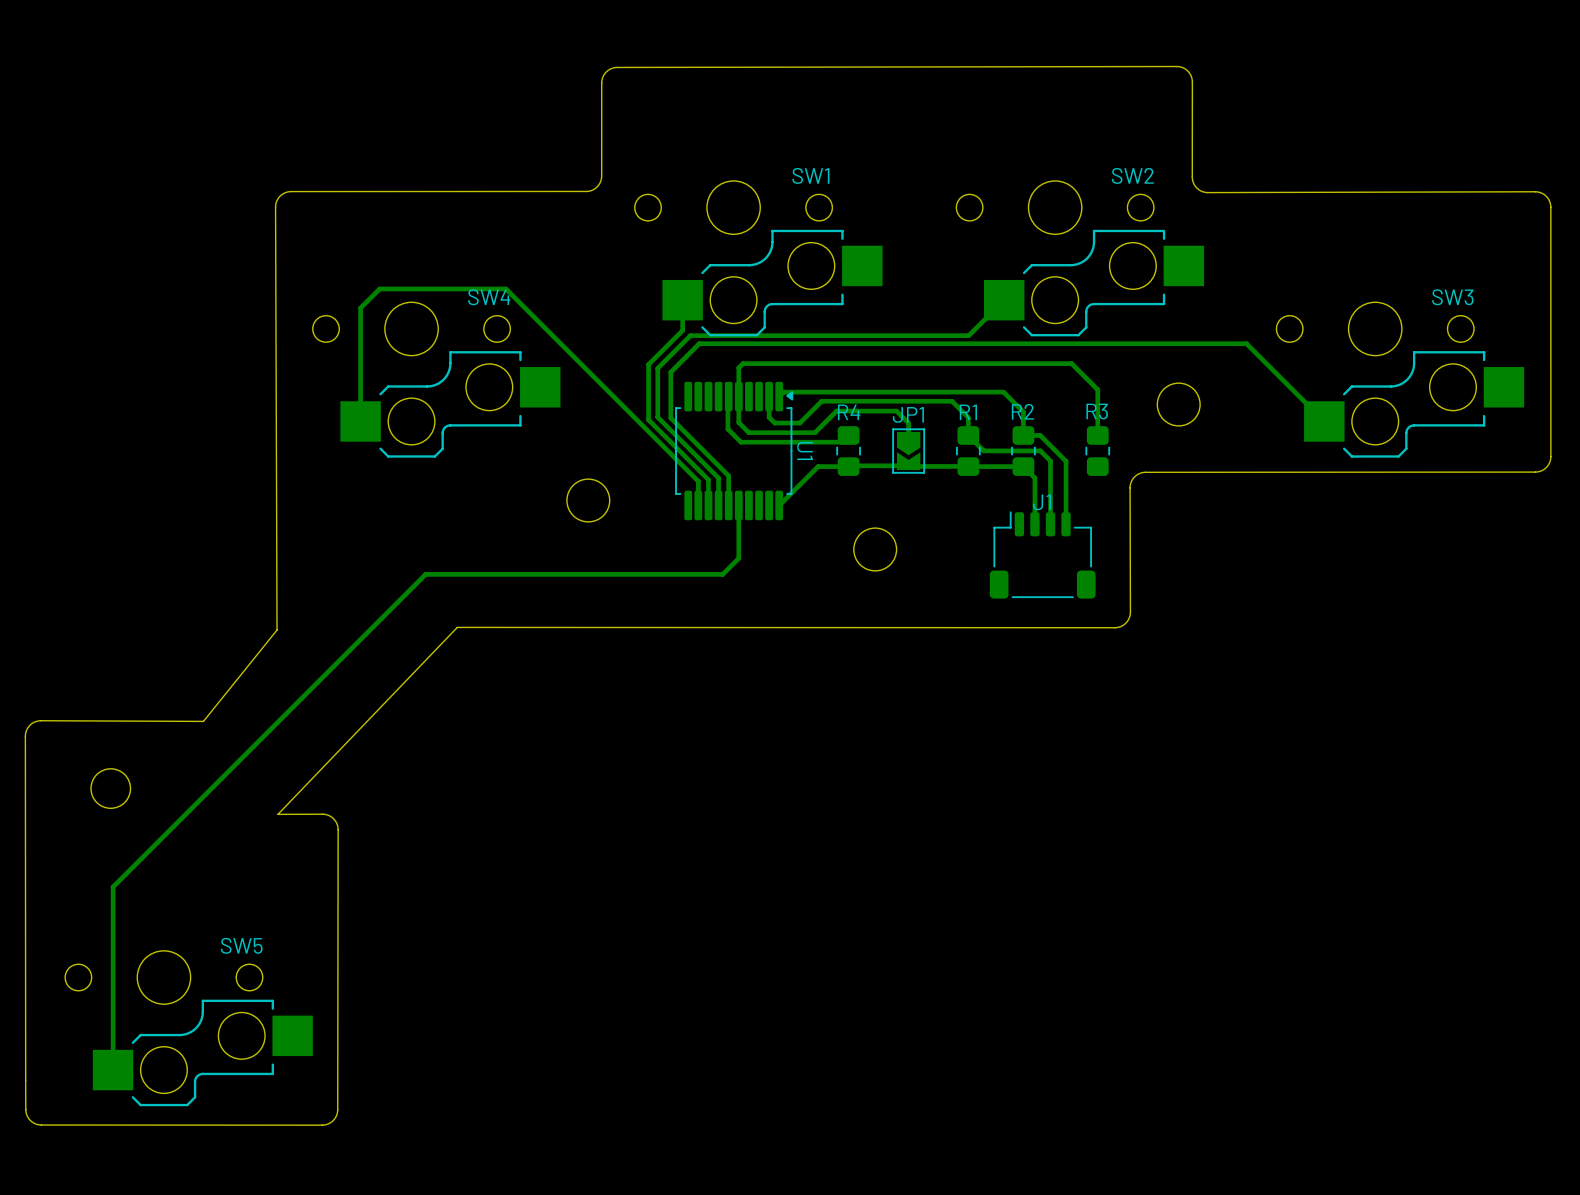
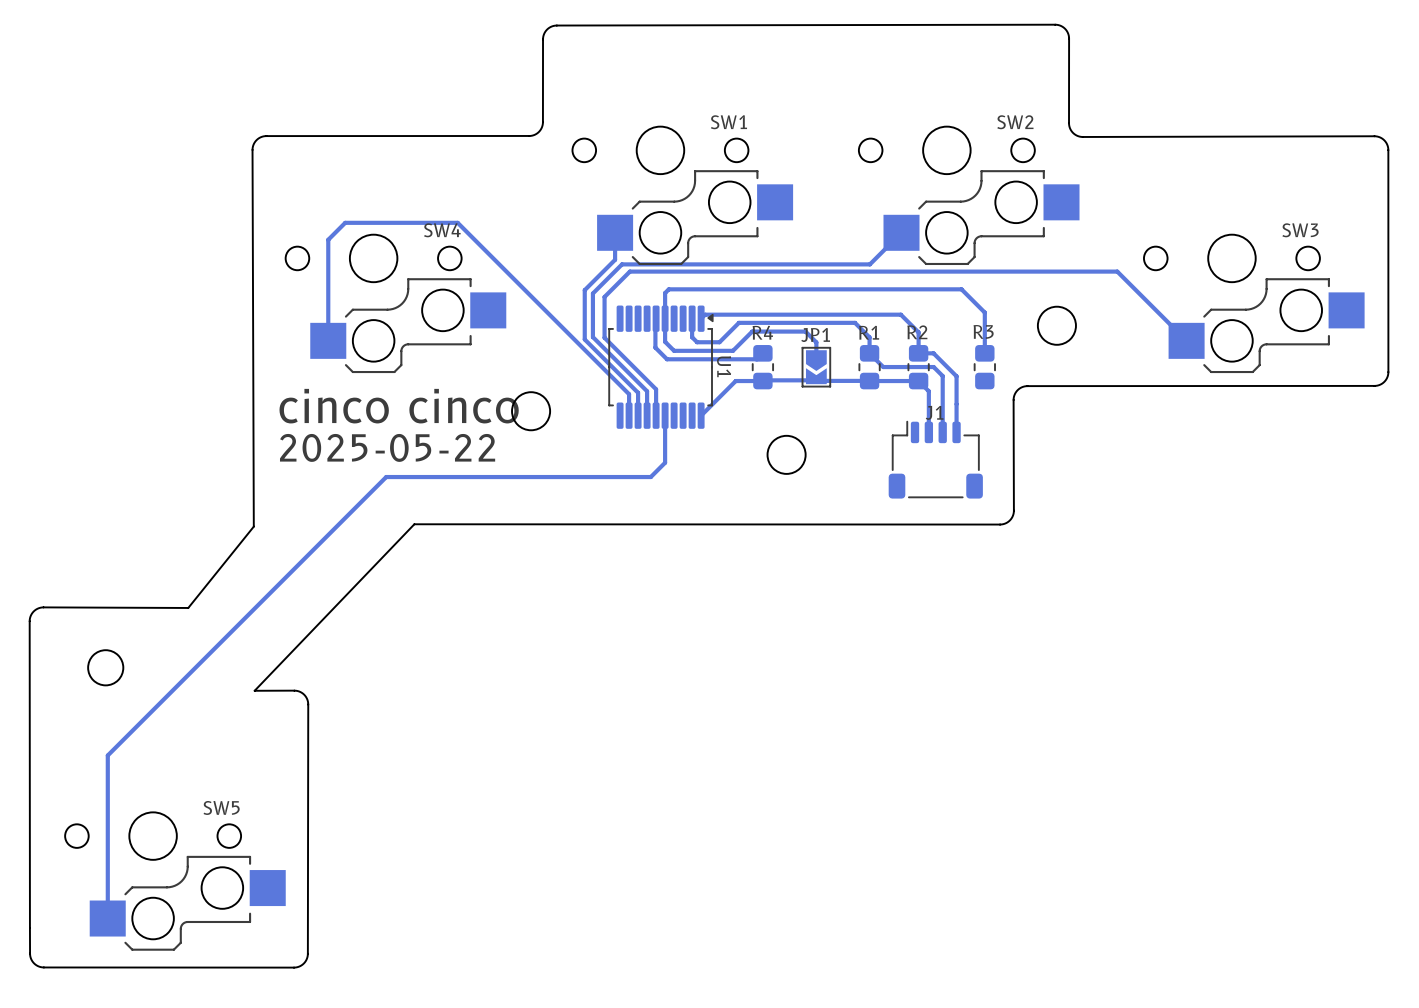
text: none -> cinco cinco (399, 406)
text: none -> 2025-05-22 (387, 447)

